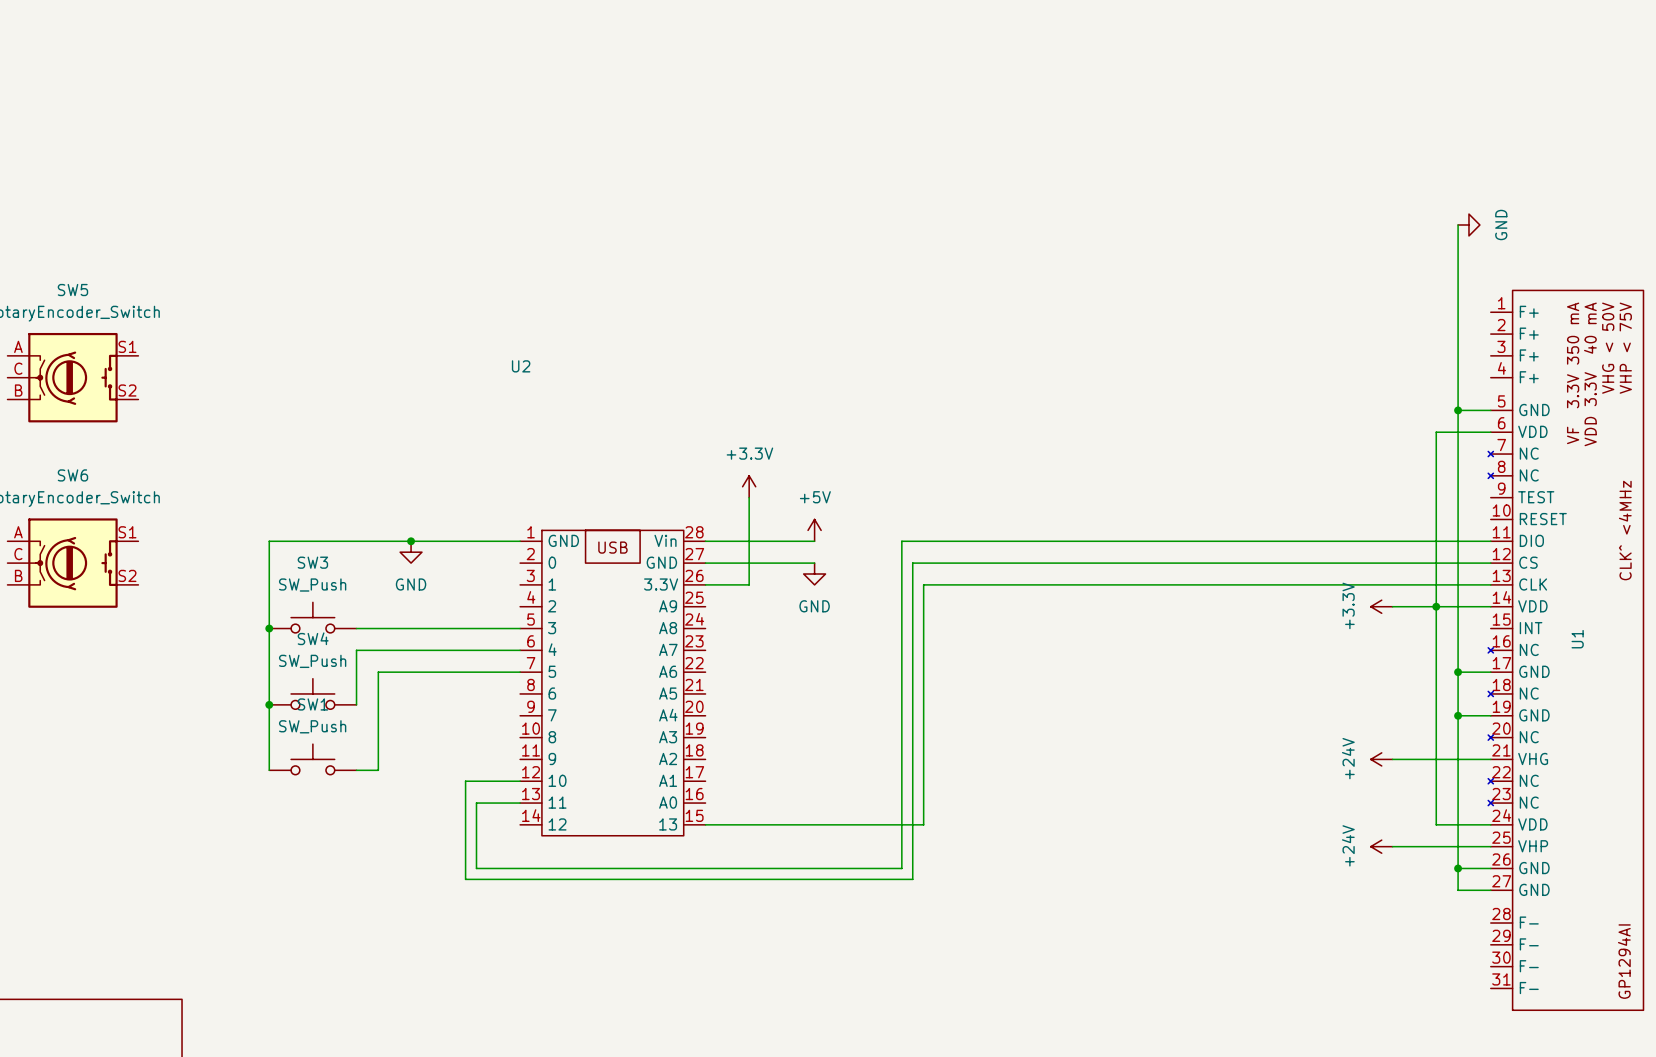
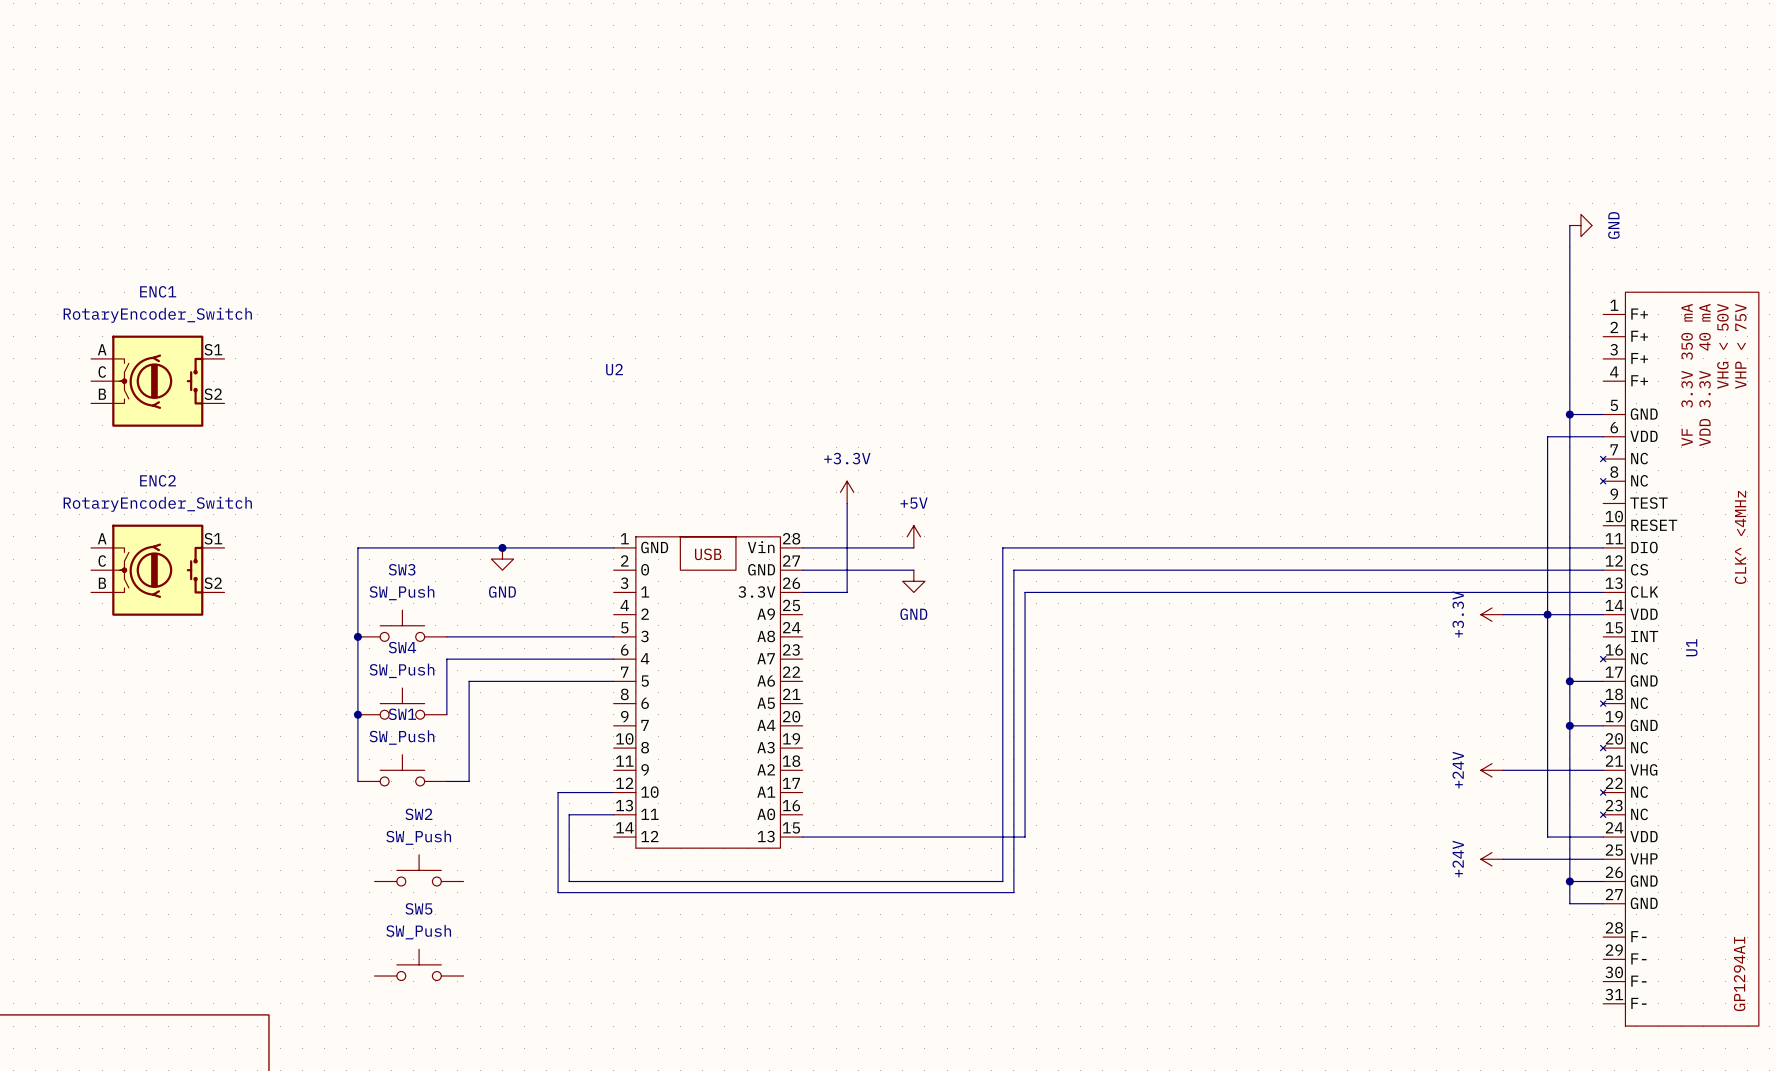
SW5 name: SW5 (72, 290) -> ENC1 (158, 291)
SW6 name: SW6 (72, 475) -> ENC2 (158, 480)
SW2: none -> SW_Push (419, 870)
SW5: none -> SW_Push (419, 964)

